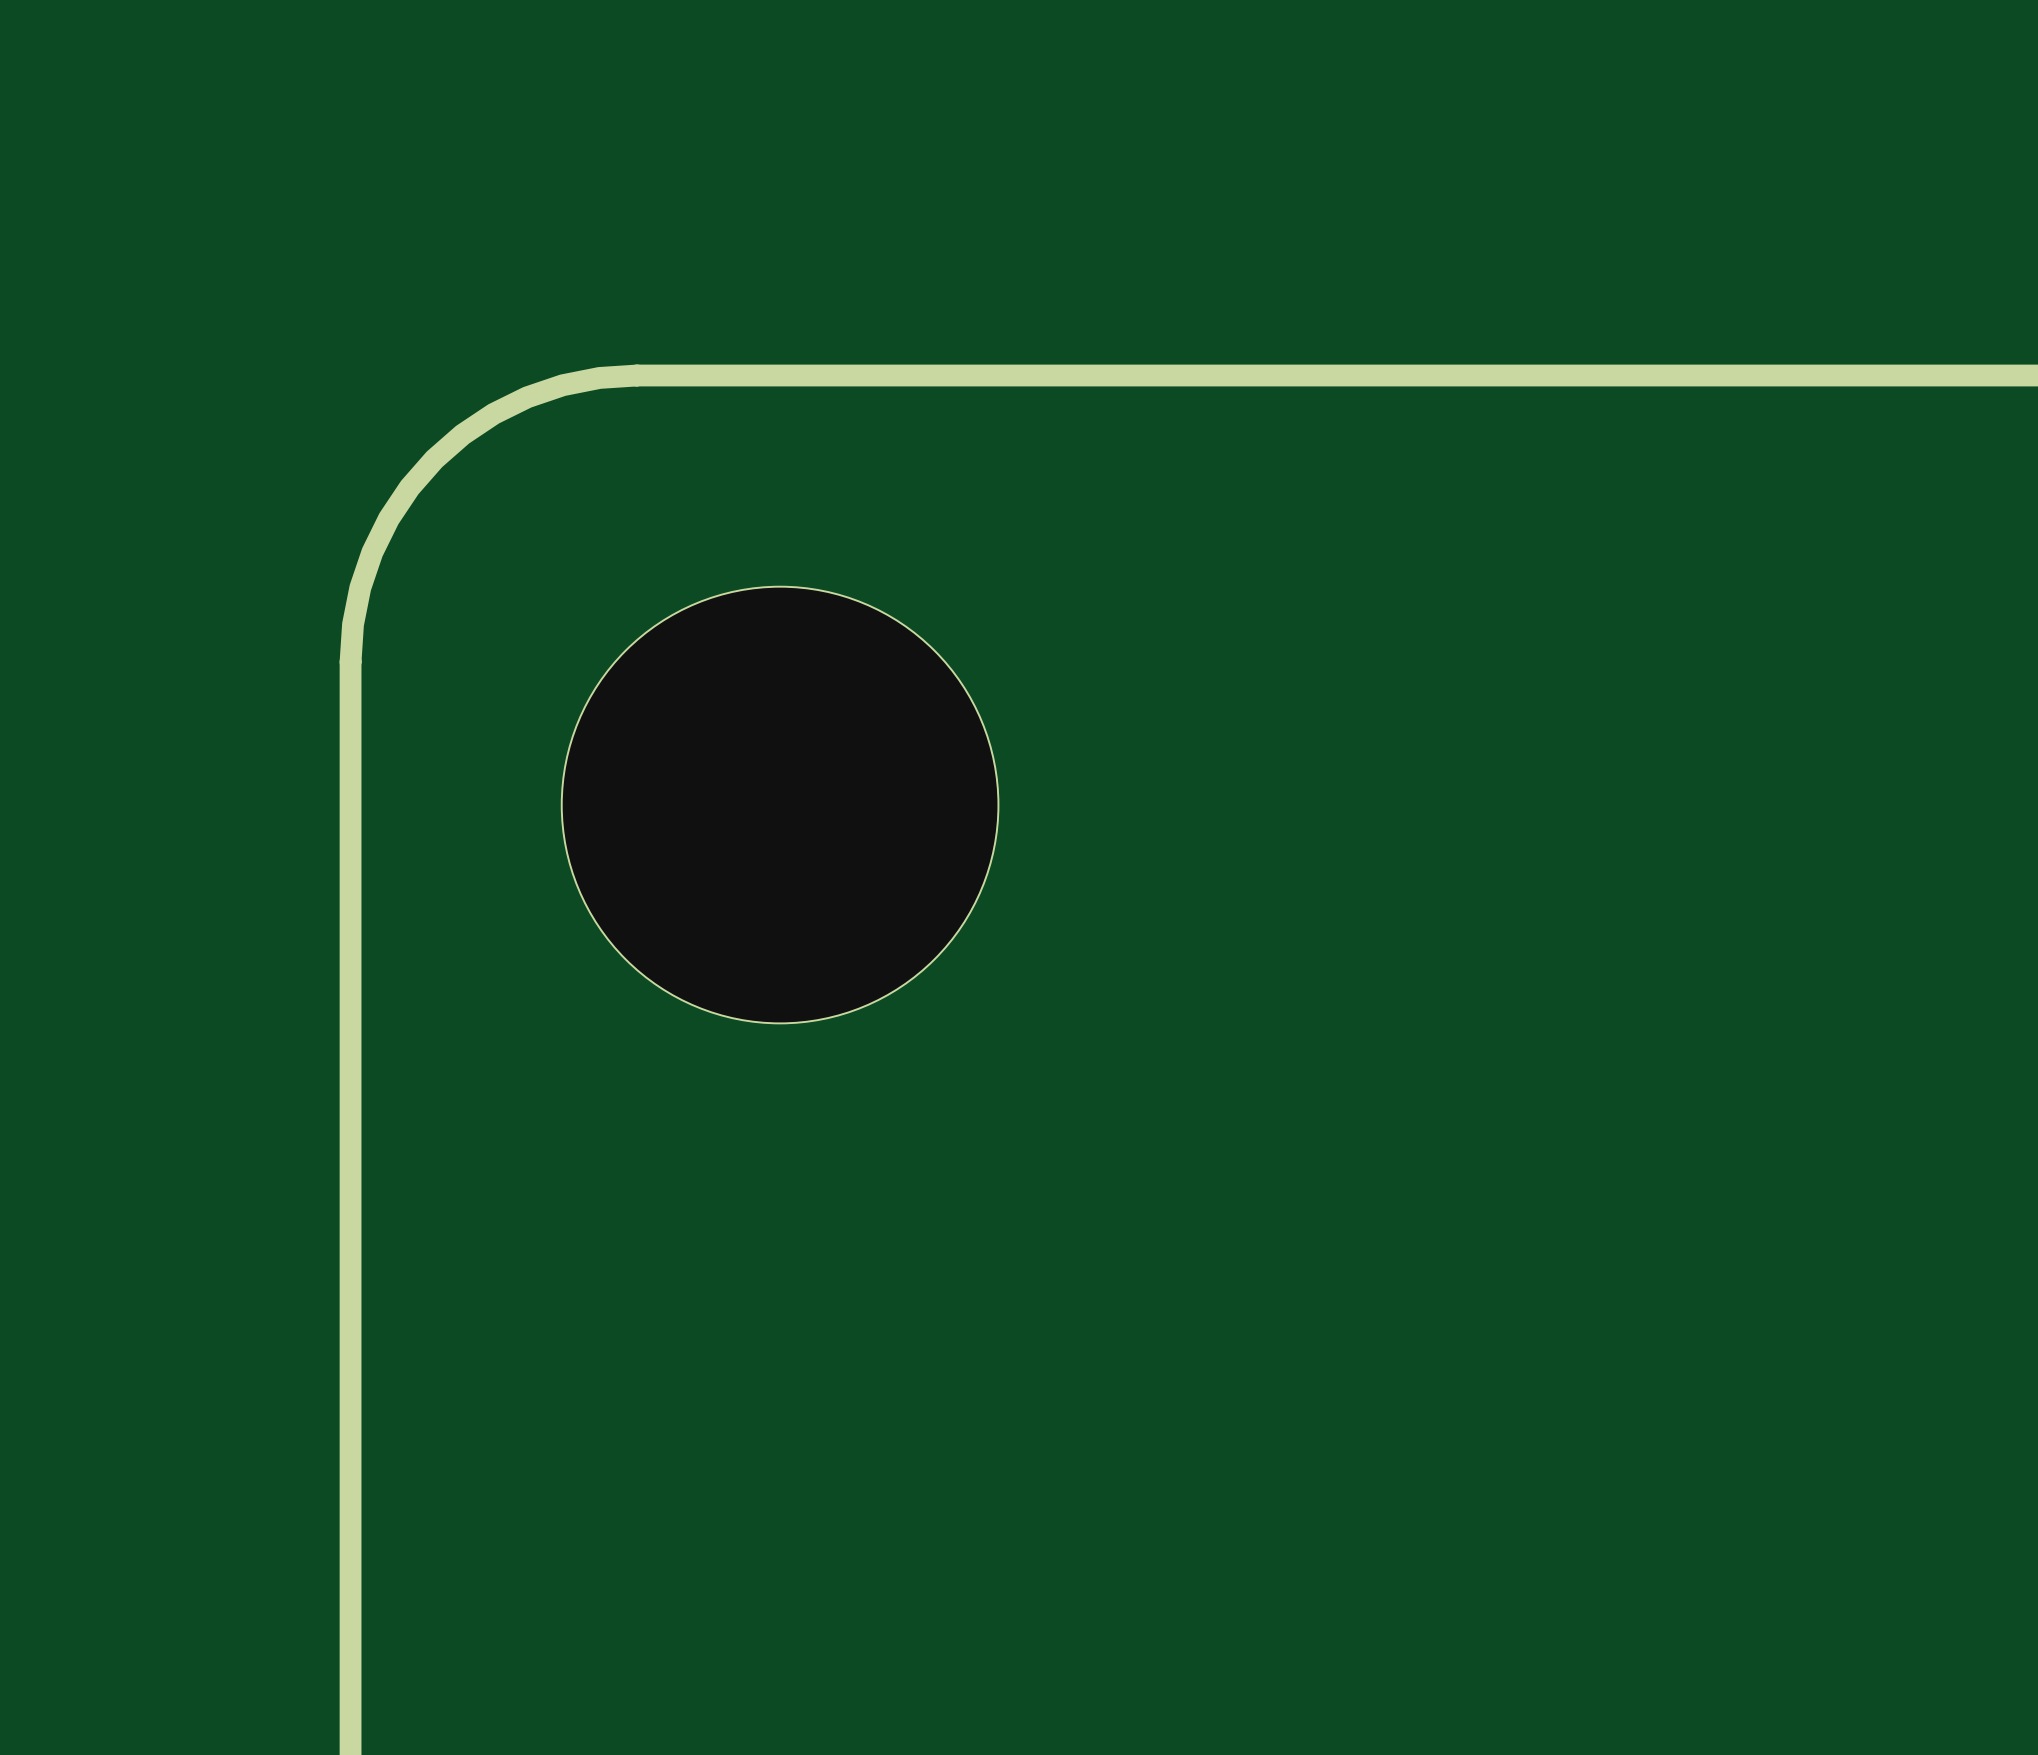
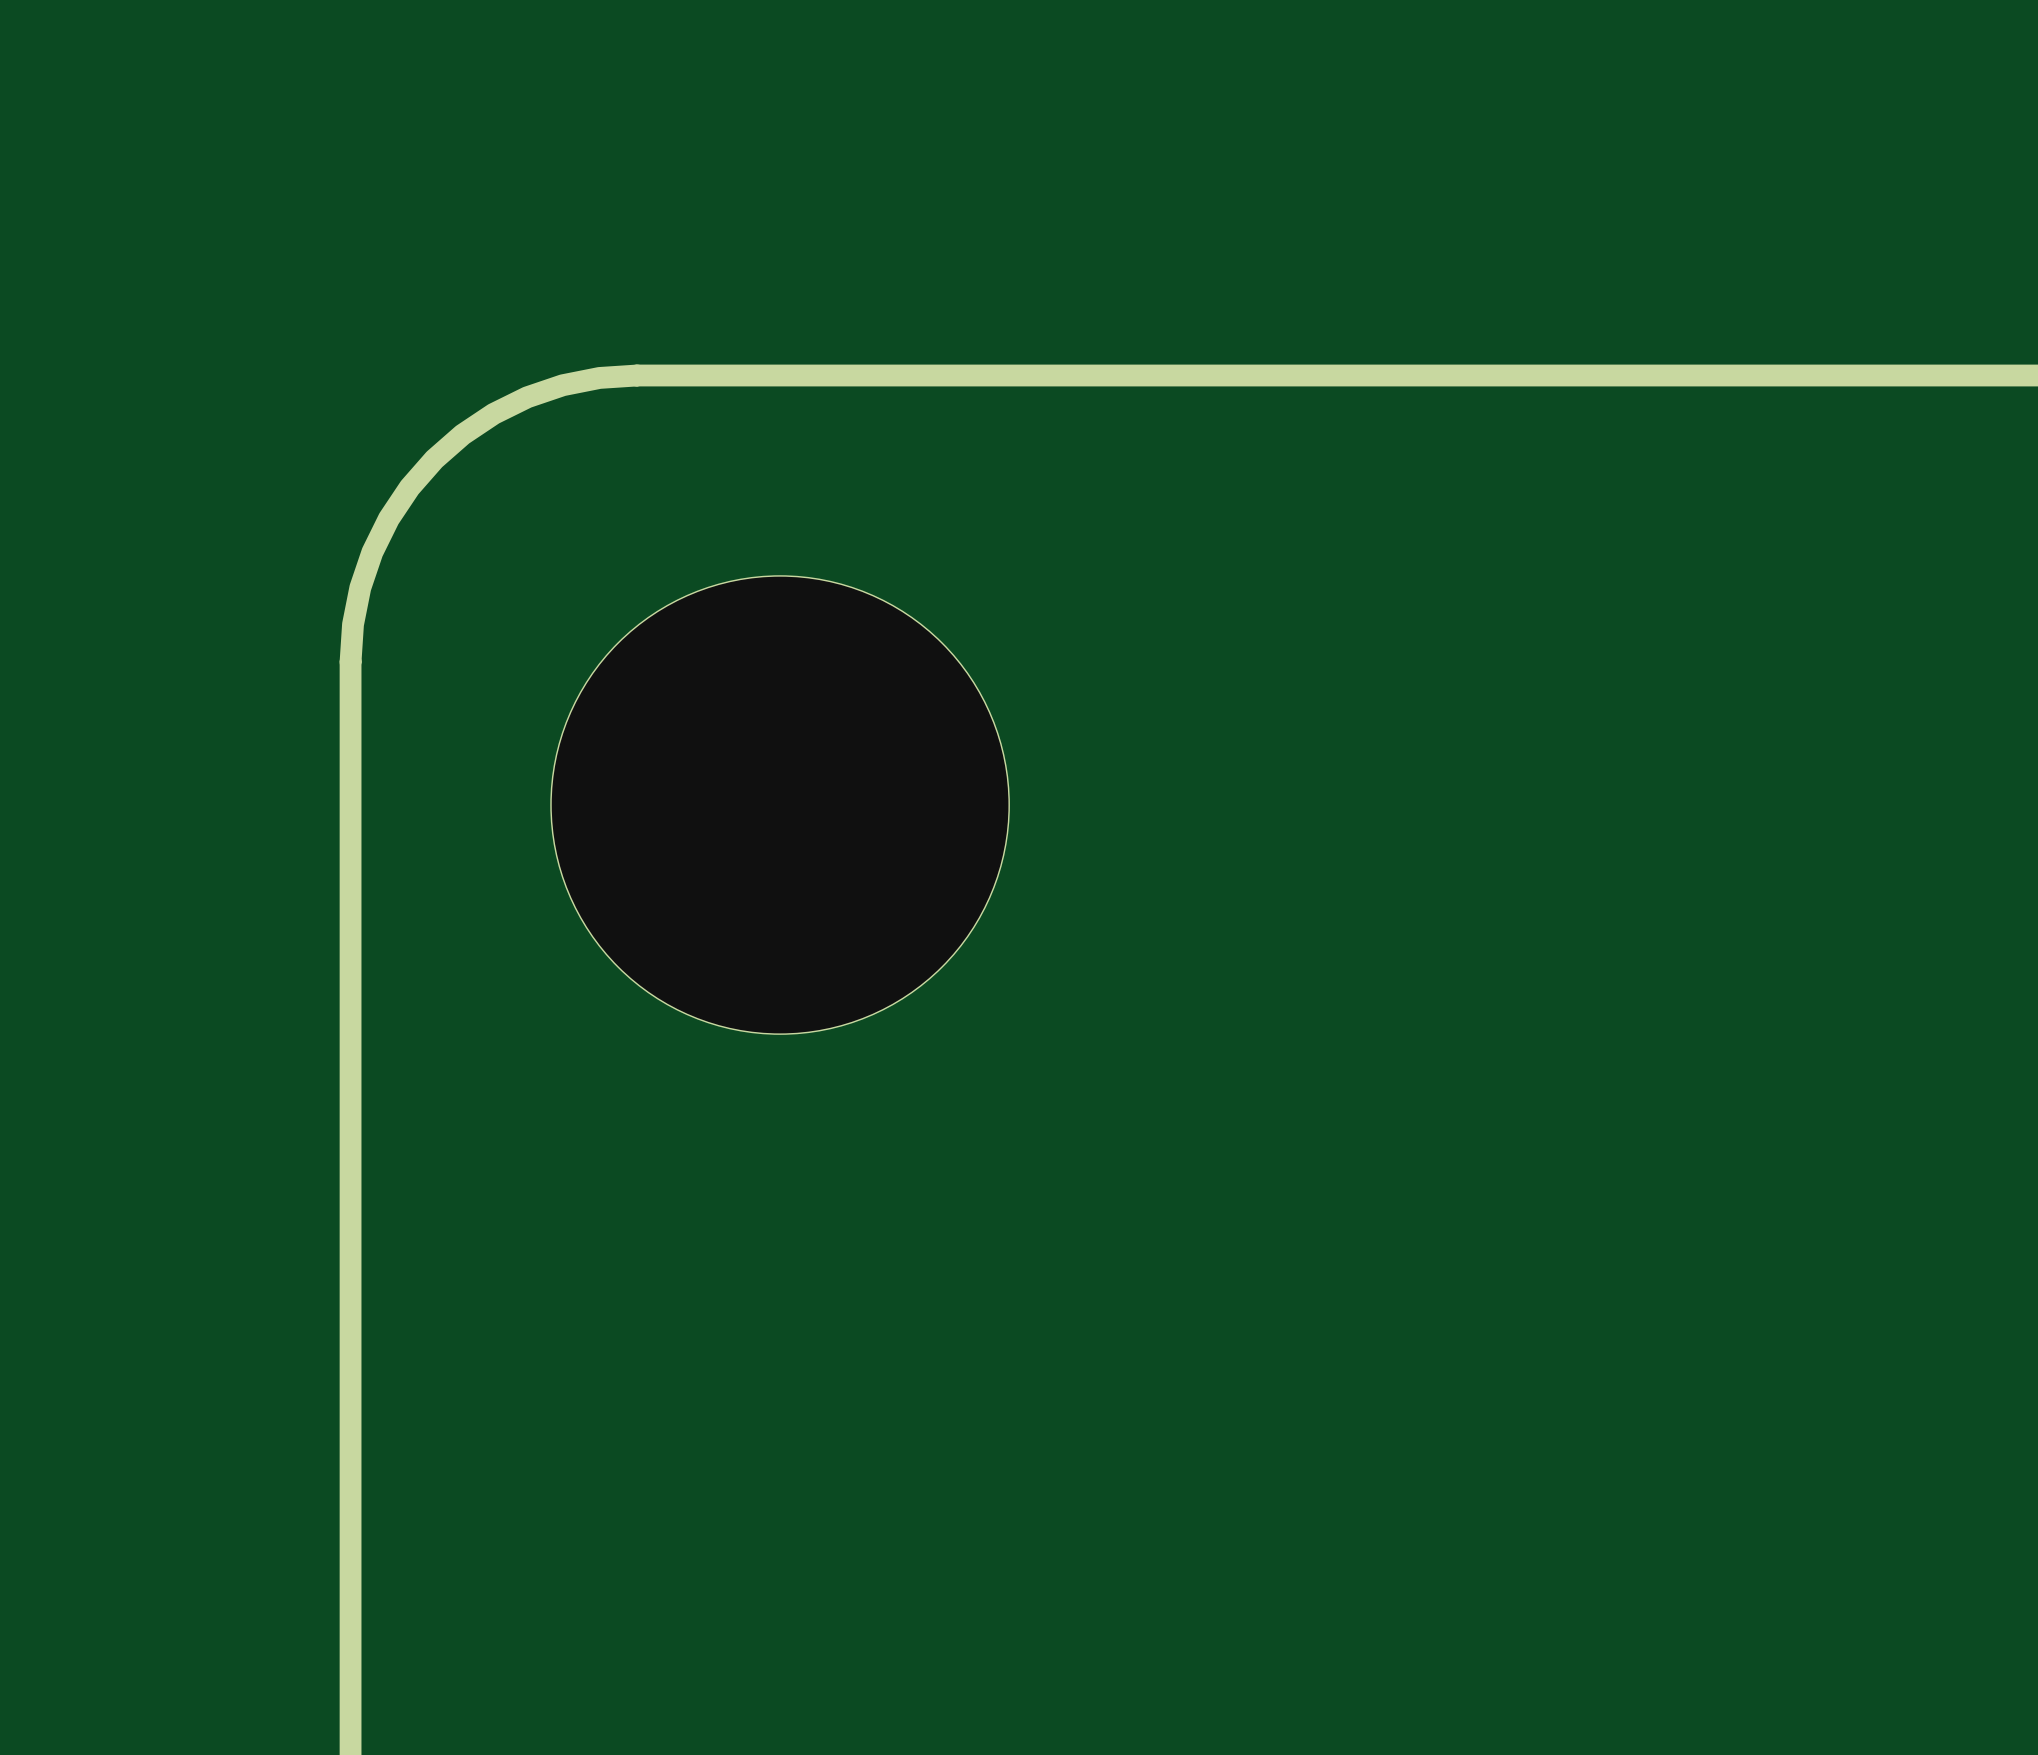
hole size: [561, 586, 999, 1024] -> [551, 575, 1010, 1035]

